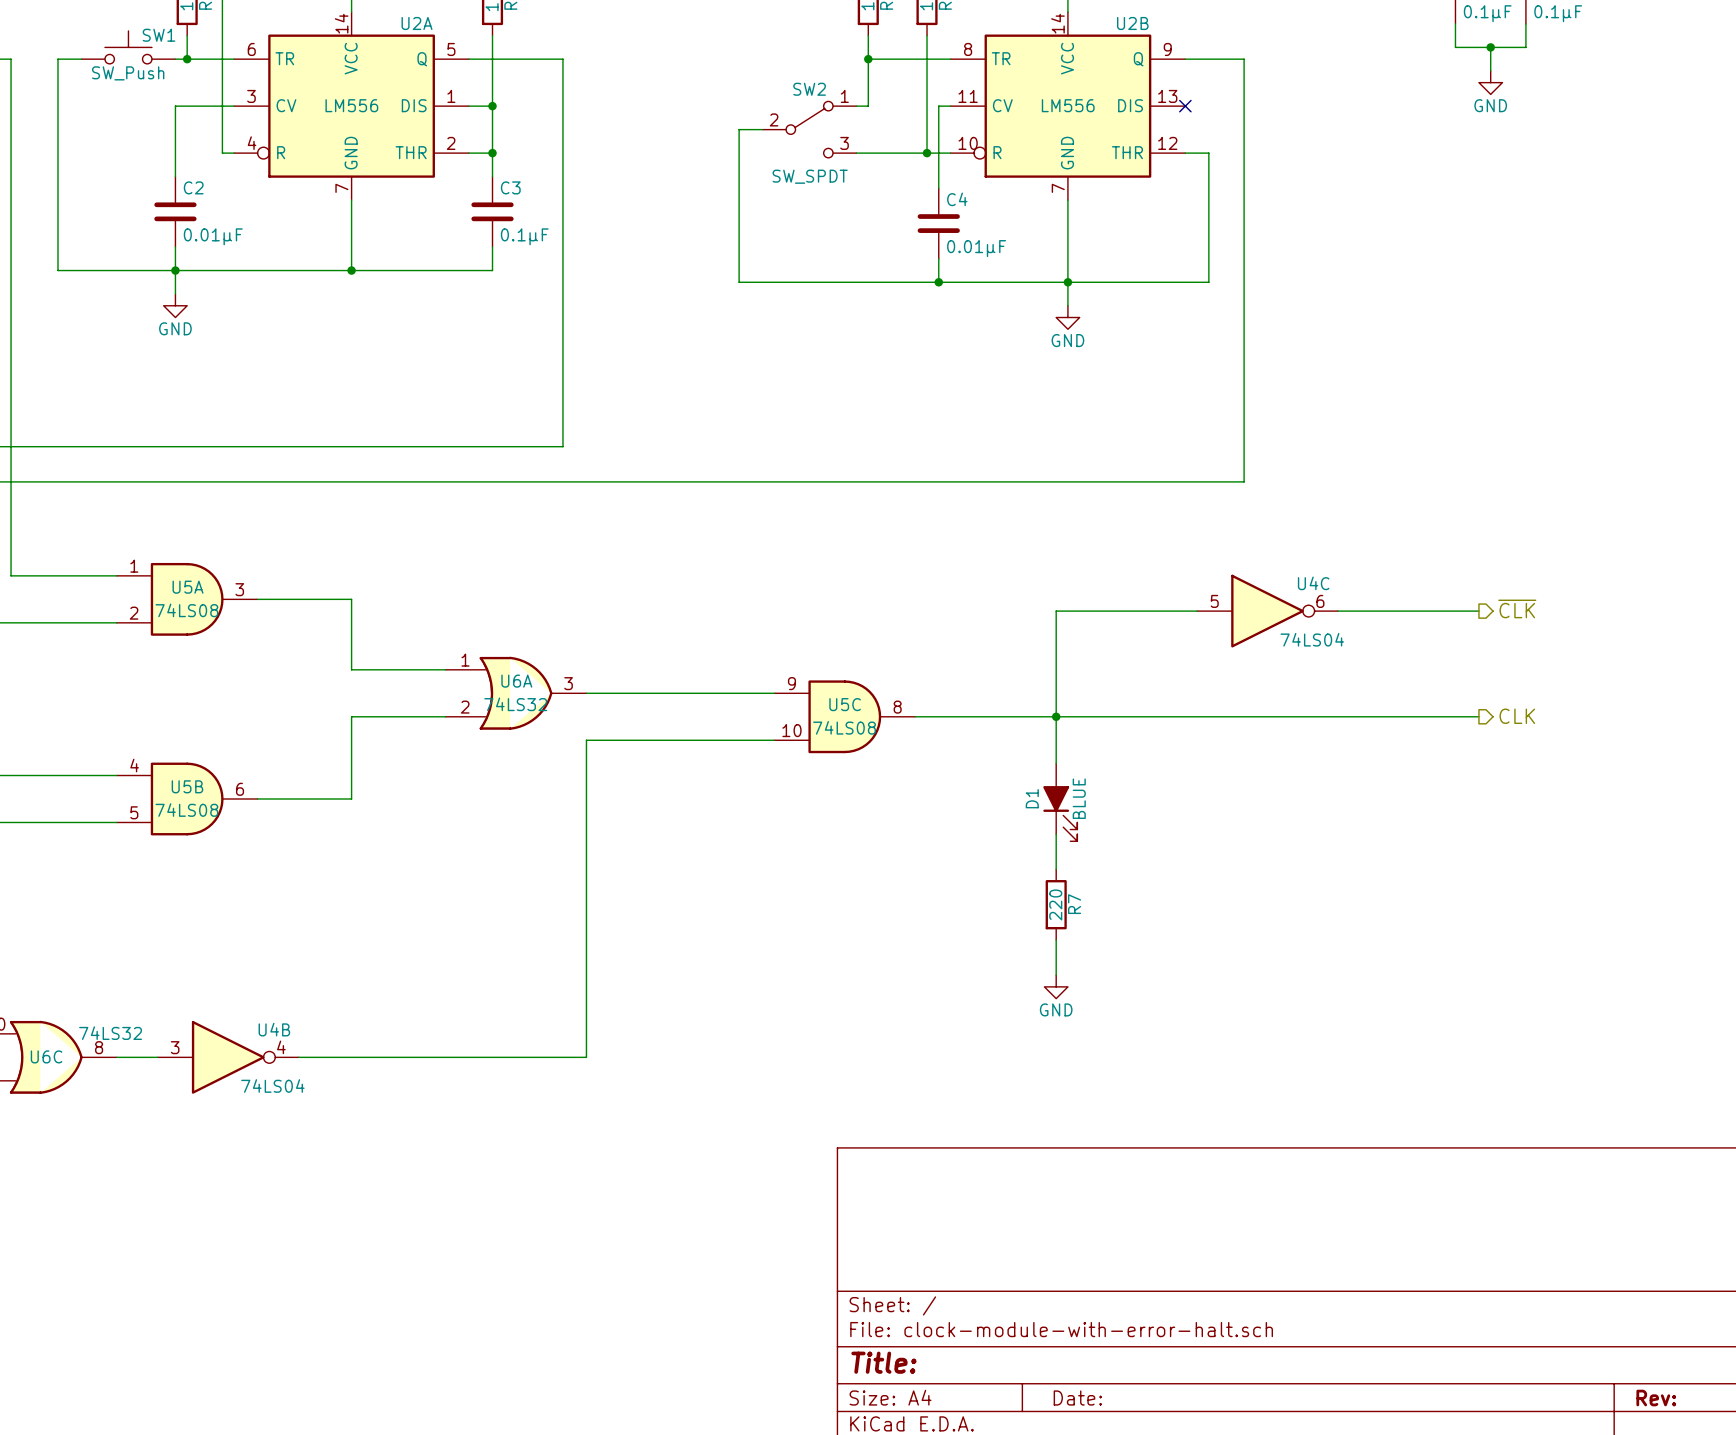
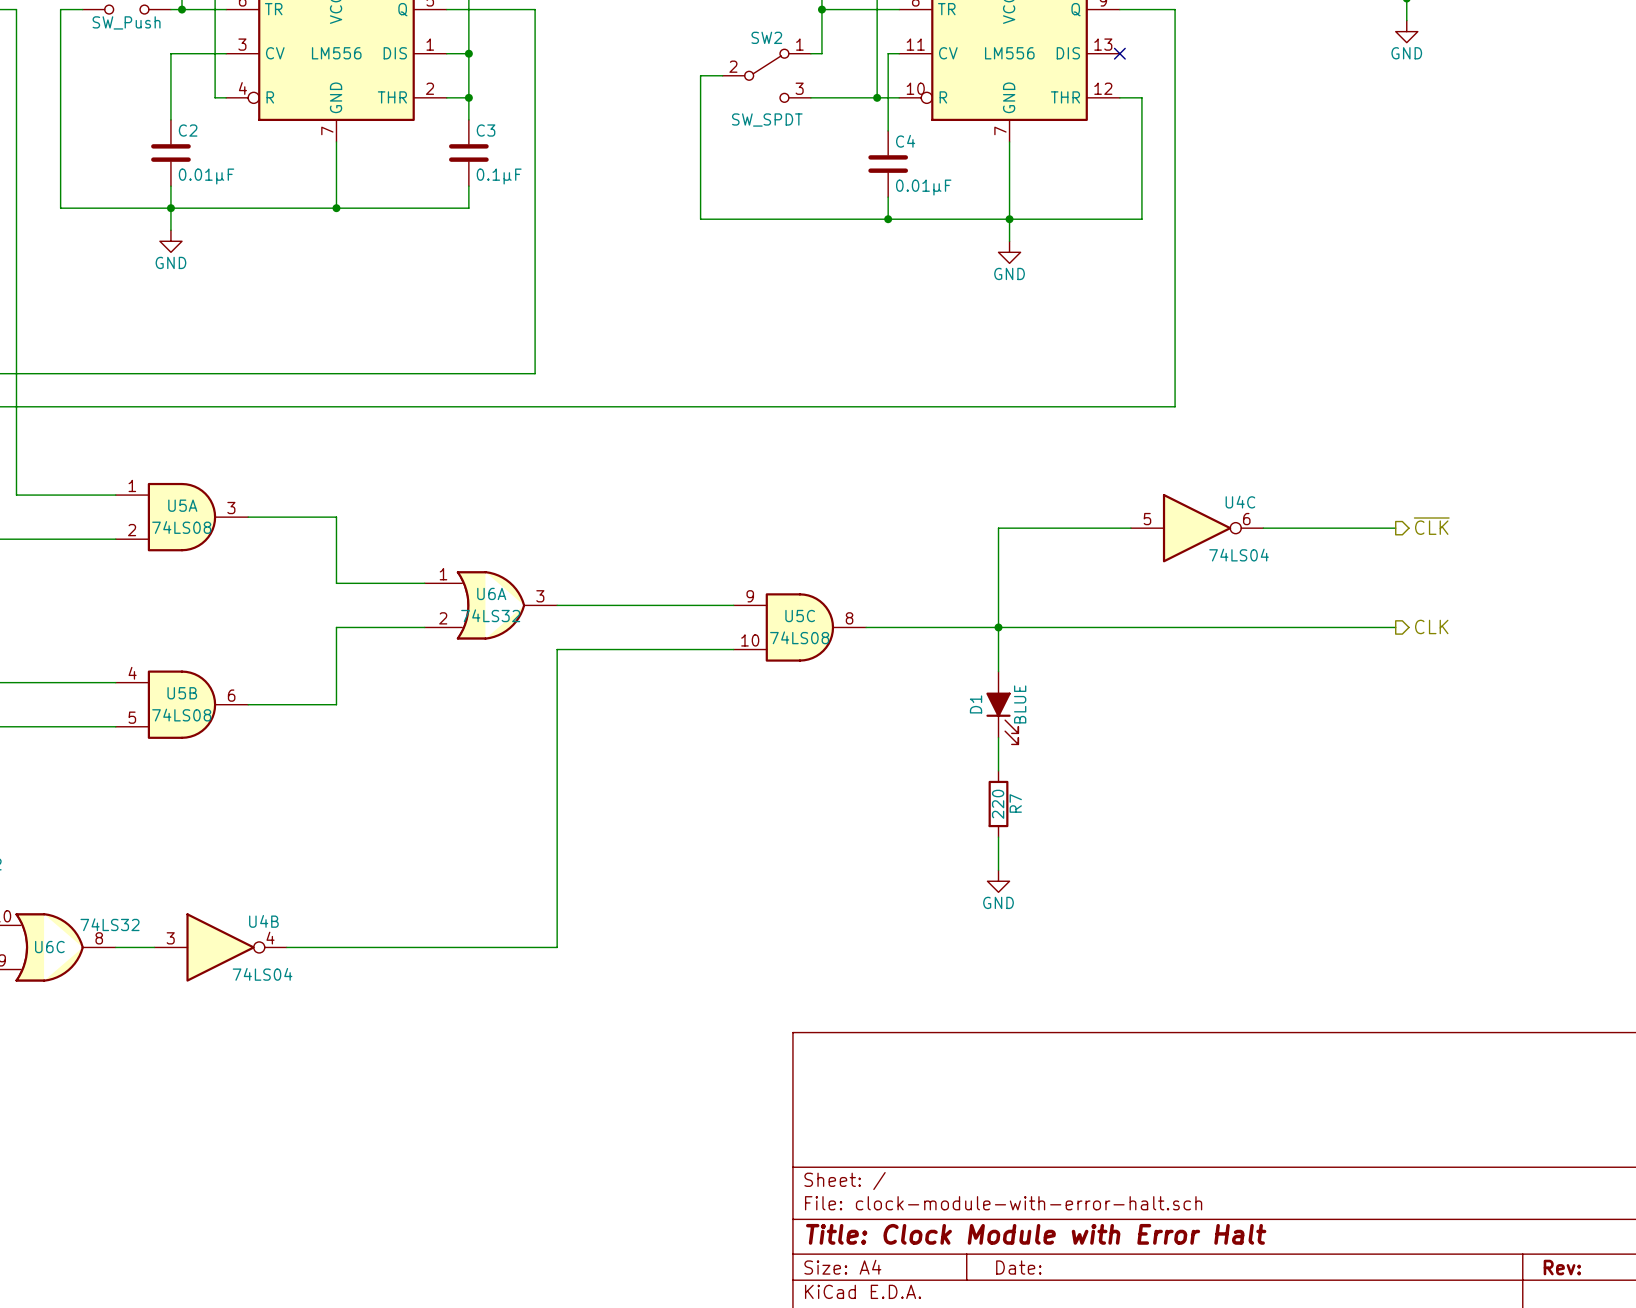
title block: Title: (883, 1362) -> Title: Clock Module with Error Halt (1036, 1234)

